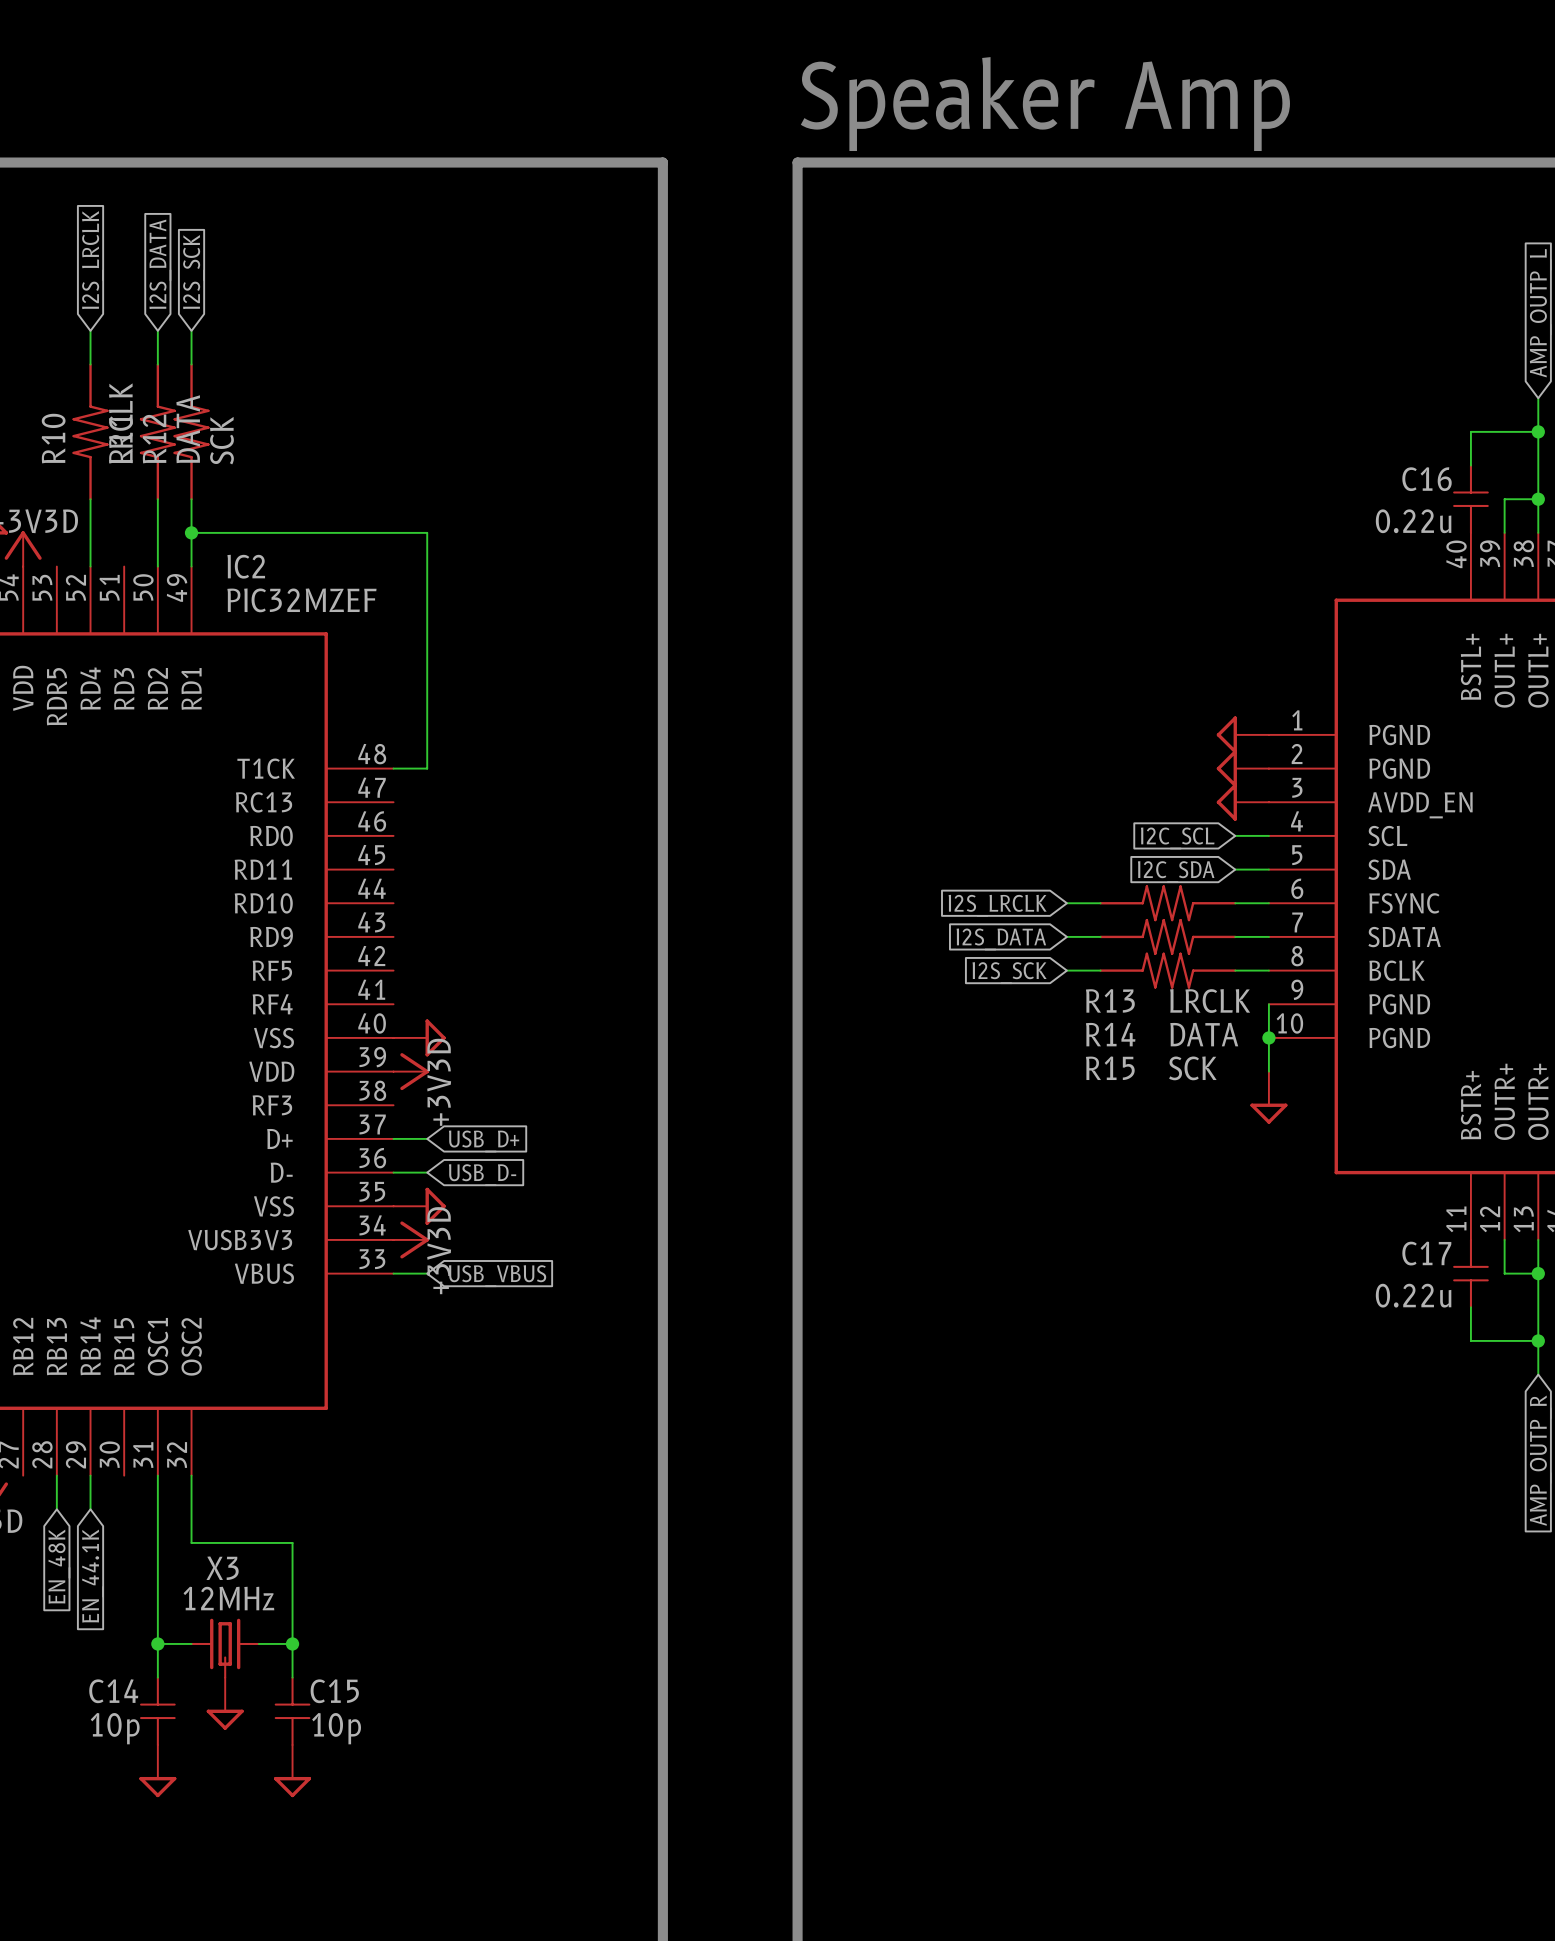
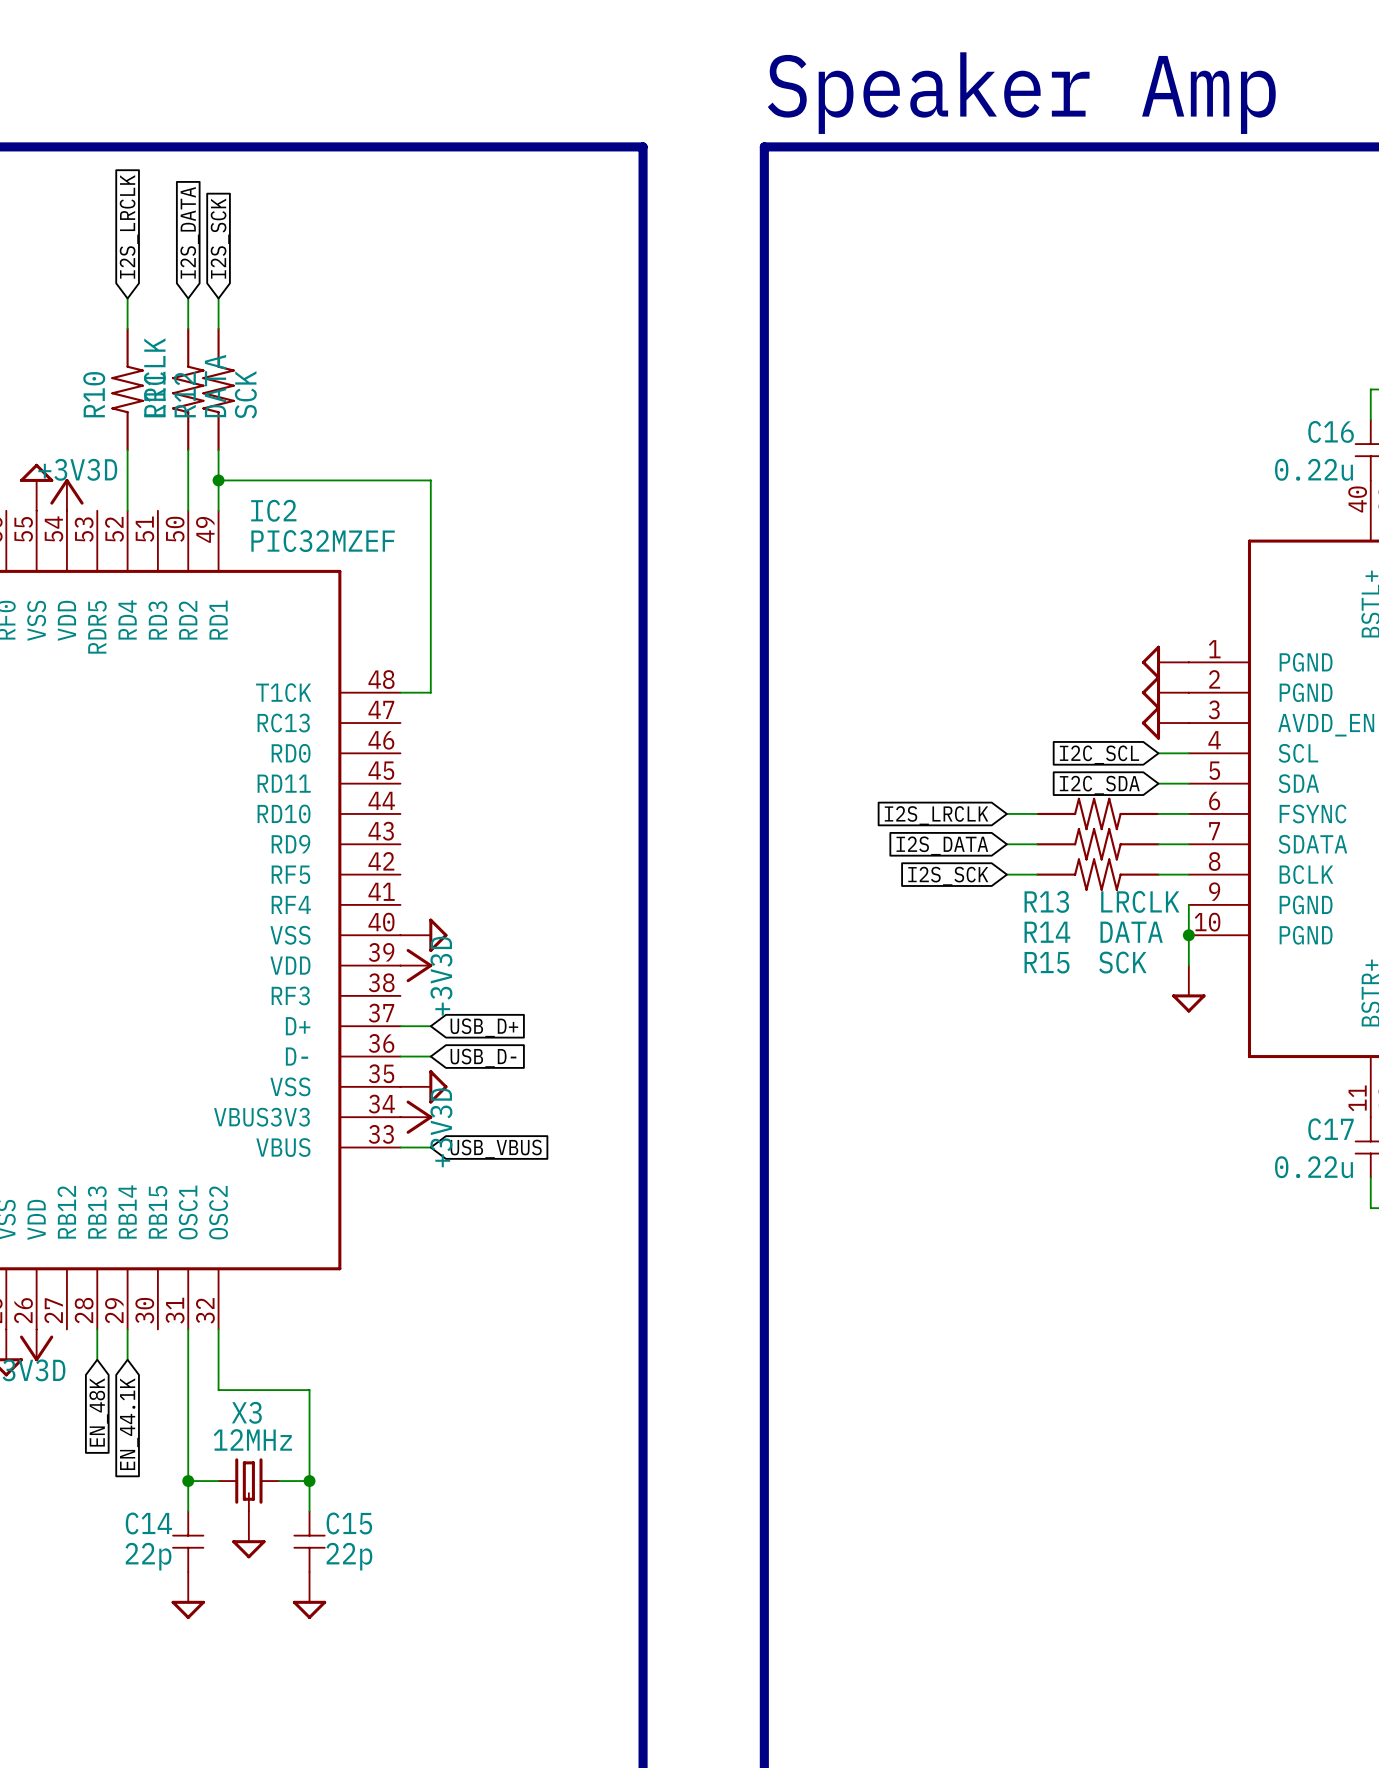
IC2 pin name: VUSB3V3 (240, 1240) -> VBUS3V3 (261, 1117)
C14 value: 10p (115, 1728) -> 22p (148, 1556)
C15 value: 10p (336, 1728) -> 22p (349, 1556)

